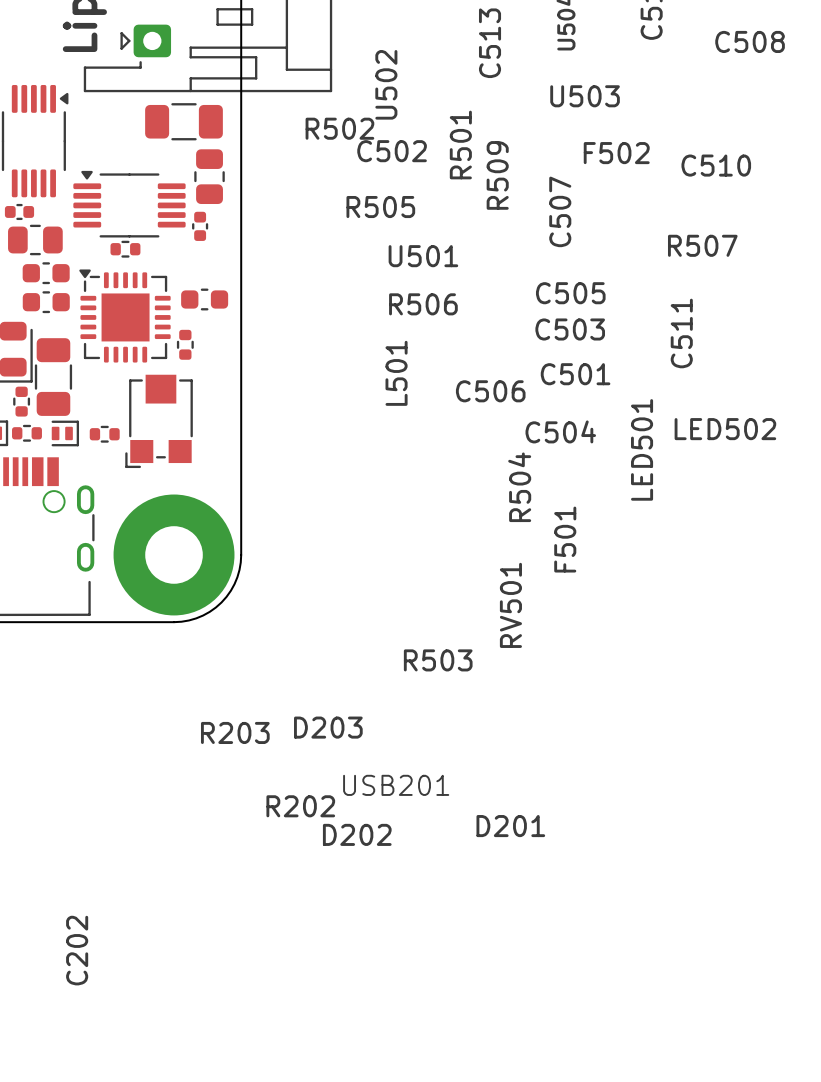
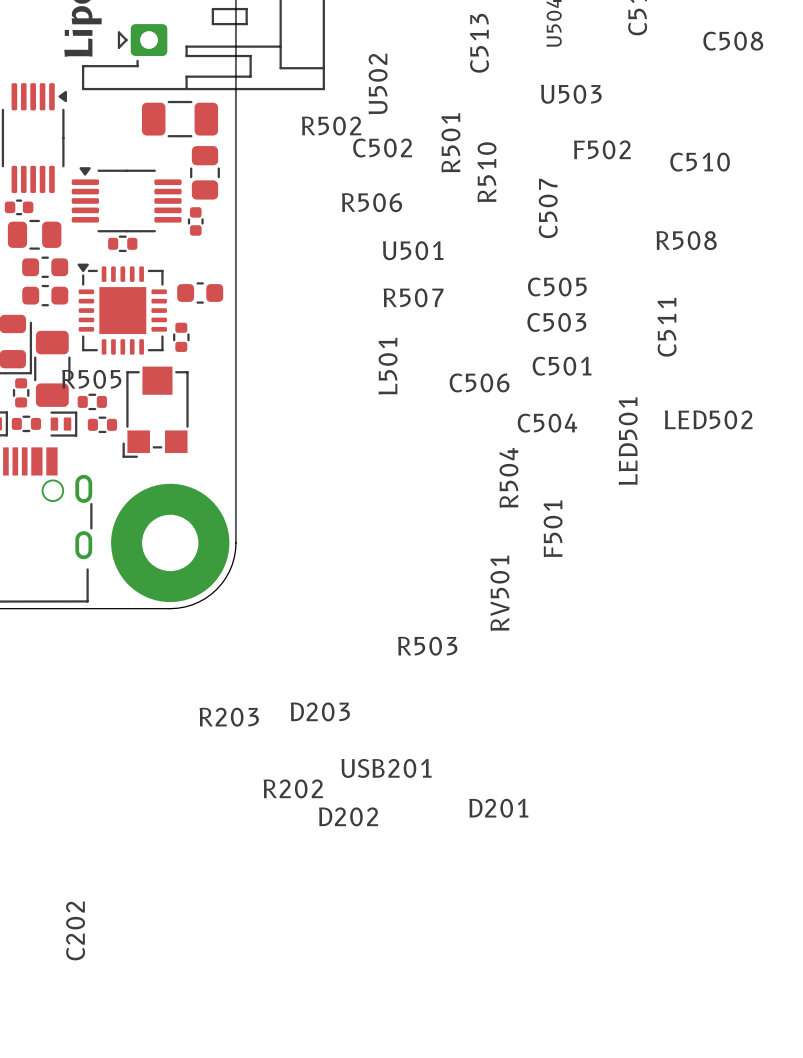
R509 name: R509 (497, 175) -> R510 (486, 172)
R505 name: R505 (380, 207) -> R506 (371, 202)
R507 name: R507 (702, 245) -> R508 (686, 240)
R506 name: R506 (423, 304) -> R507 (413, 297)
R505: none -> (92, 401)

